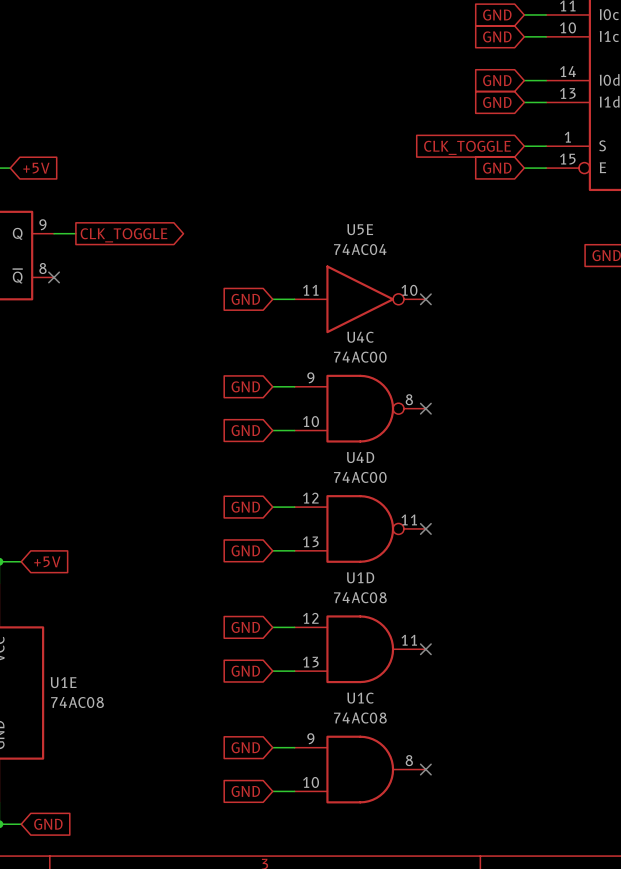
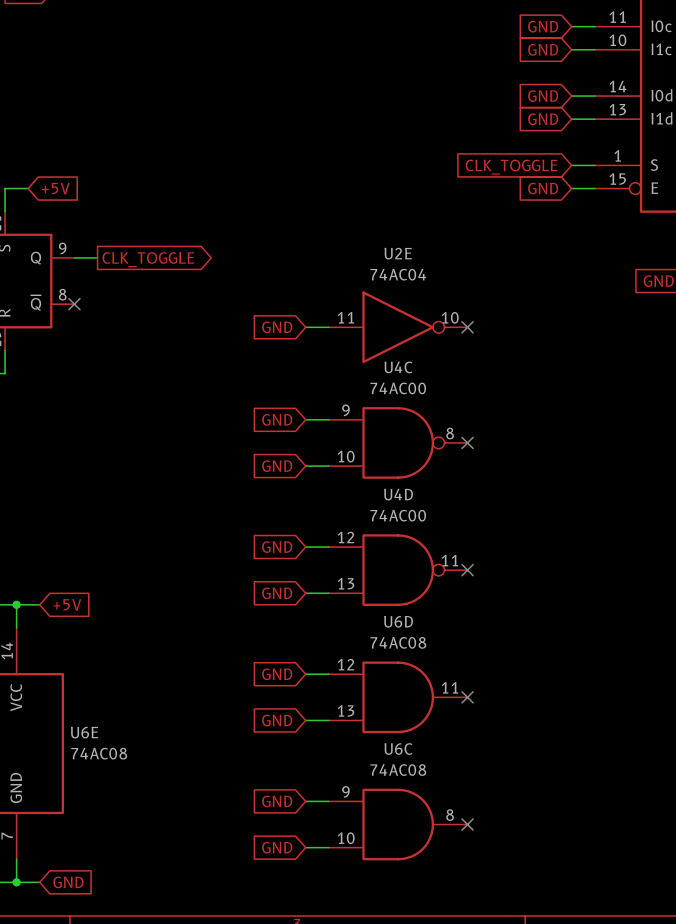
U5E name: U5E (360, 229) -> U2E (398, 253)
U1D name: U1D (360, 577) -> U6D (398, 621)
U1E name: U1E (63, 682) -> U6E (84, 732)
U1C name: U1C (360, 698) -> U6C (398, 749)

